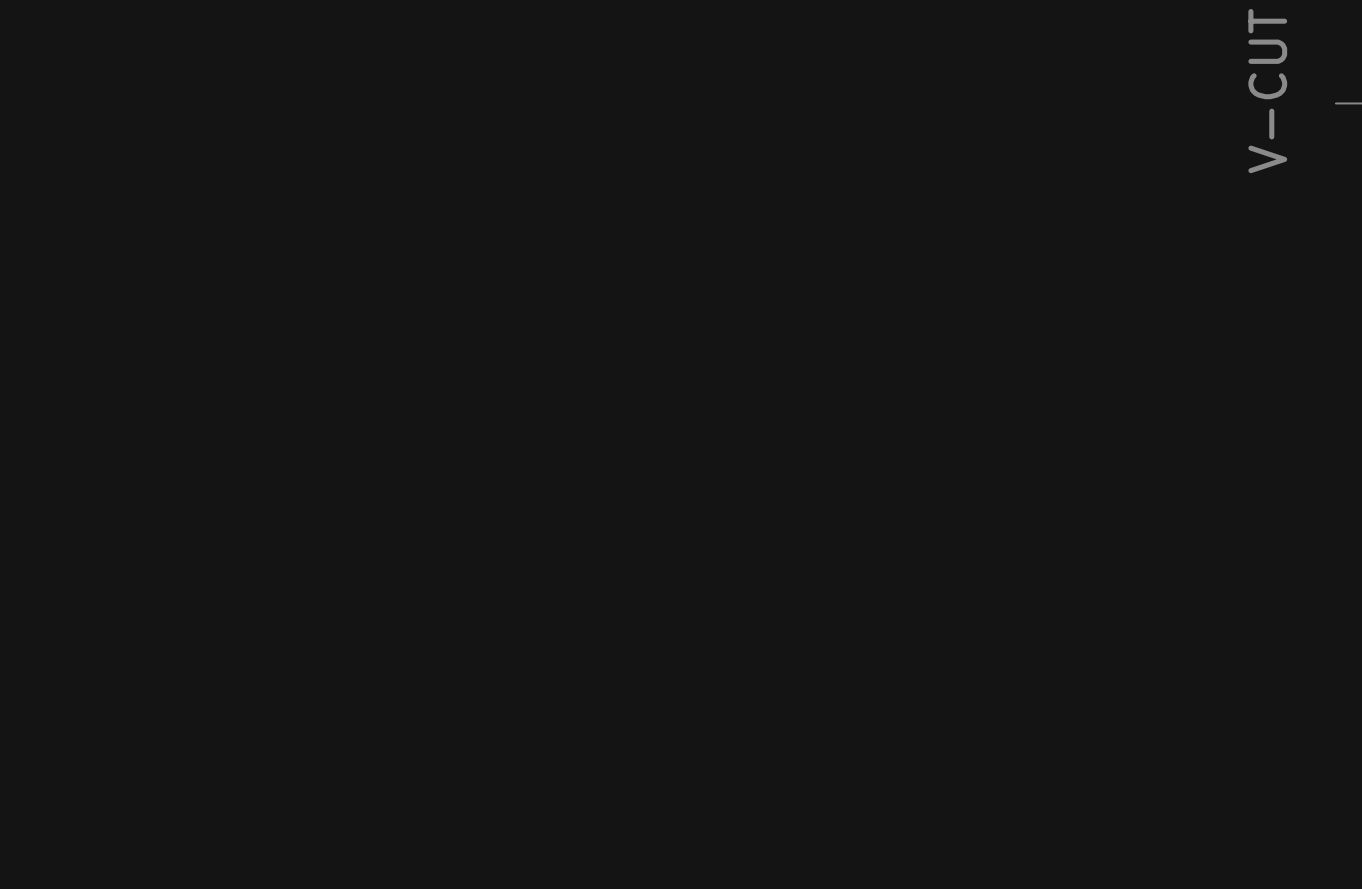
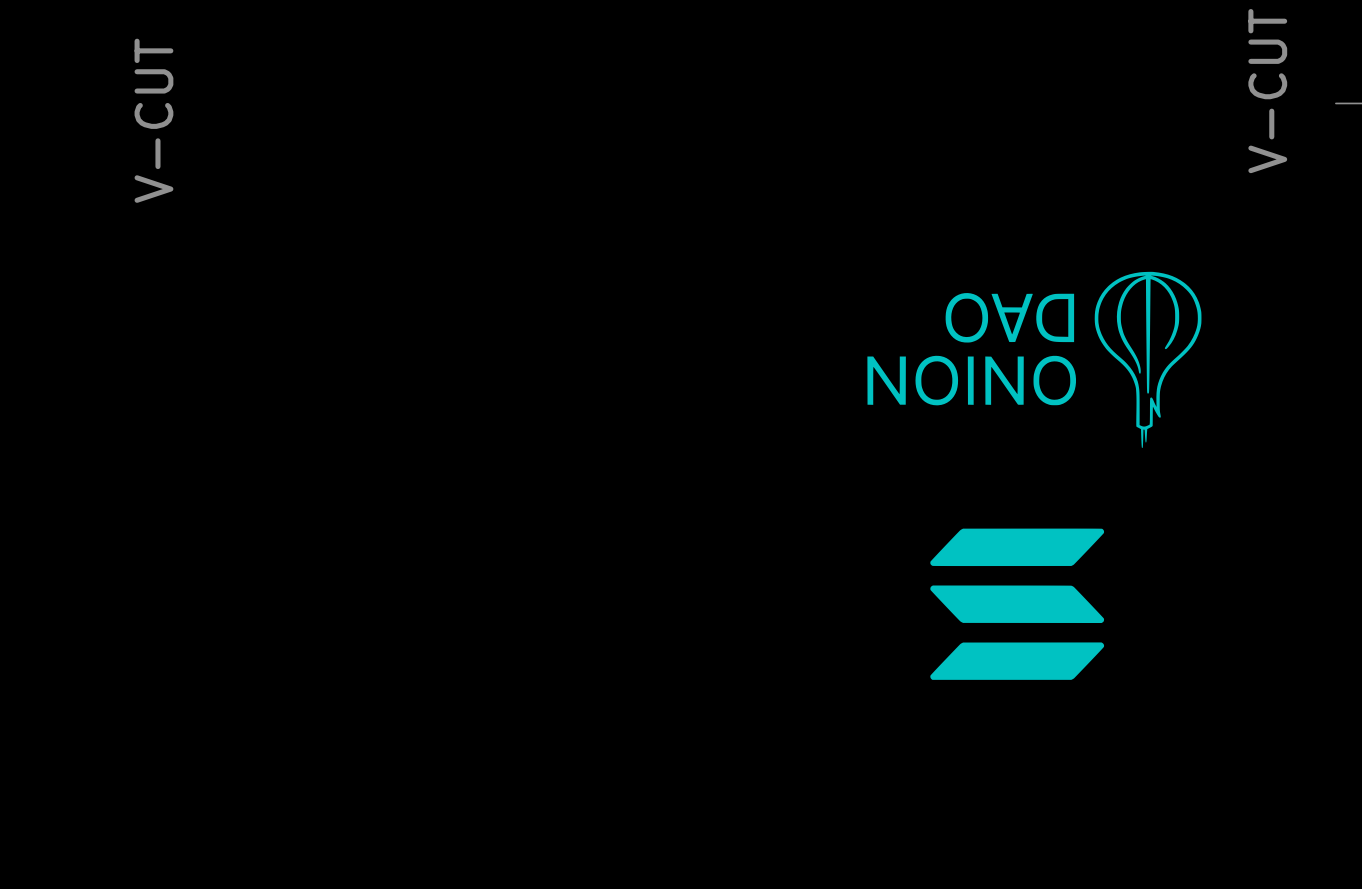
text: none -> V-CUT (153, 120)
drawing: none -> [867, 271, 1202, 448]
drawing: none -> [930, 528, 1105, 680]

